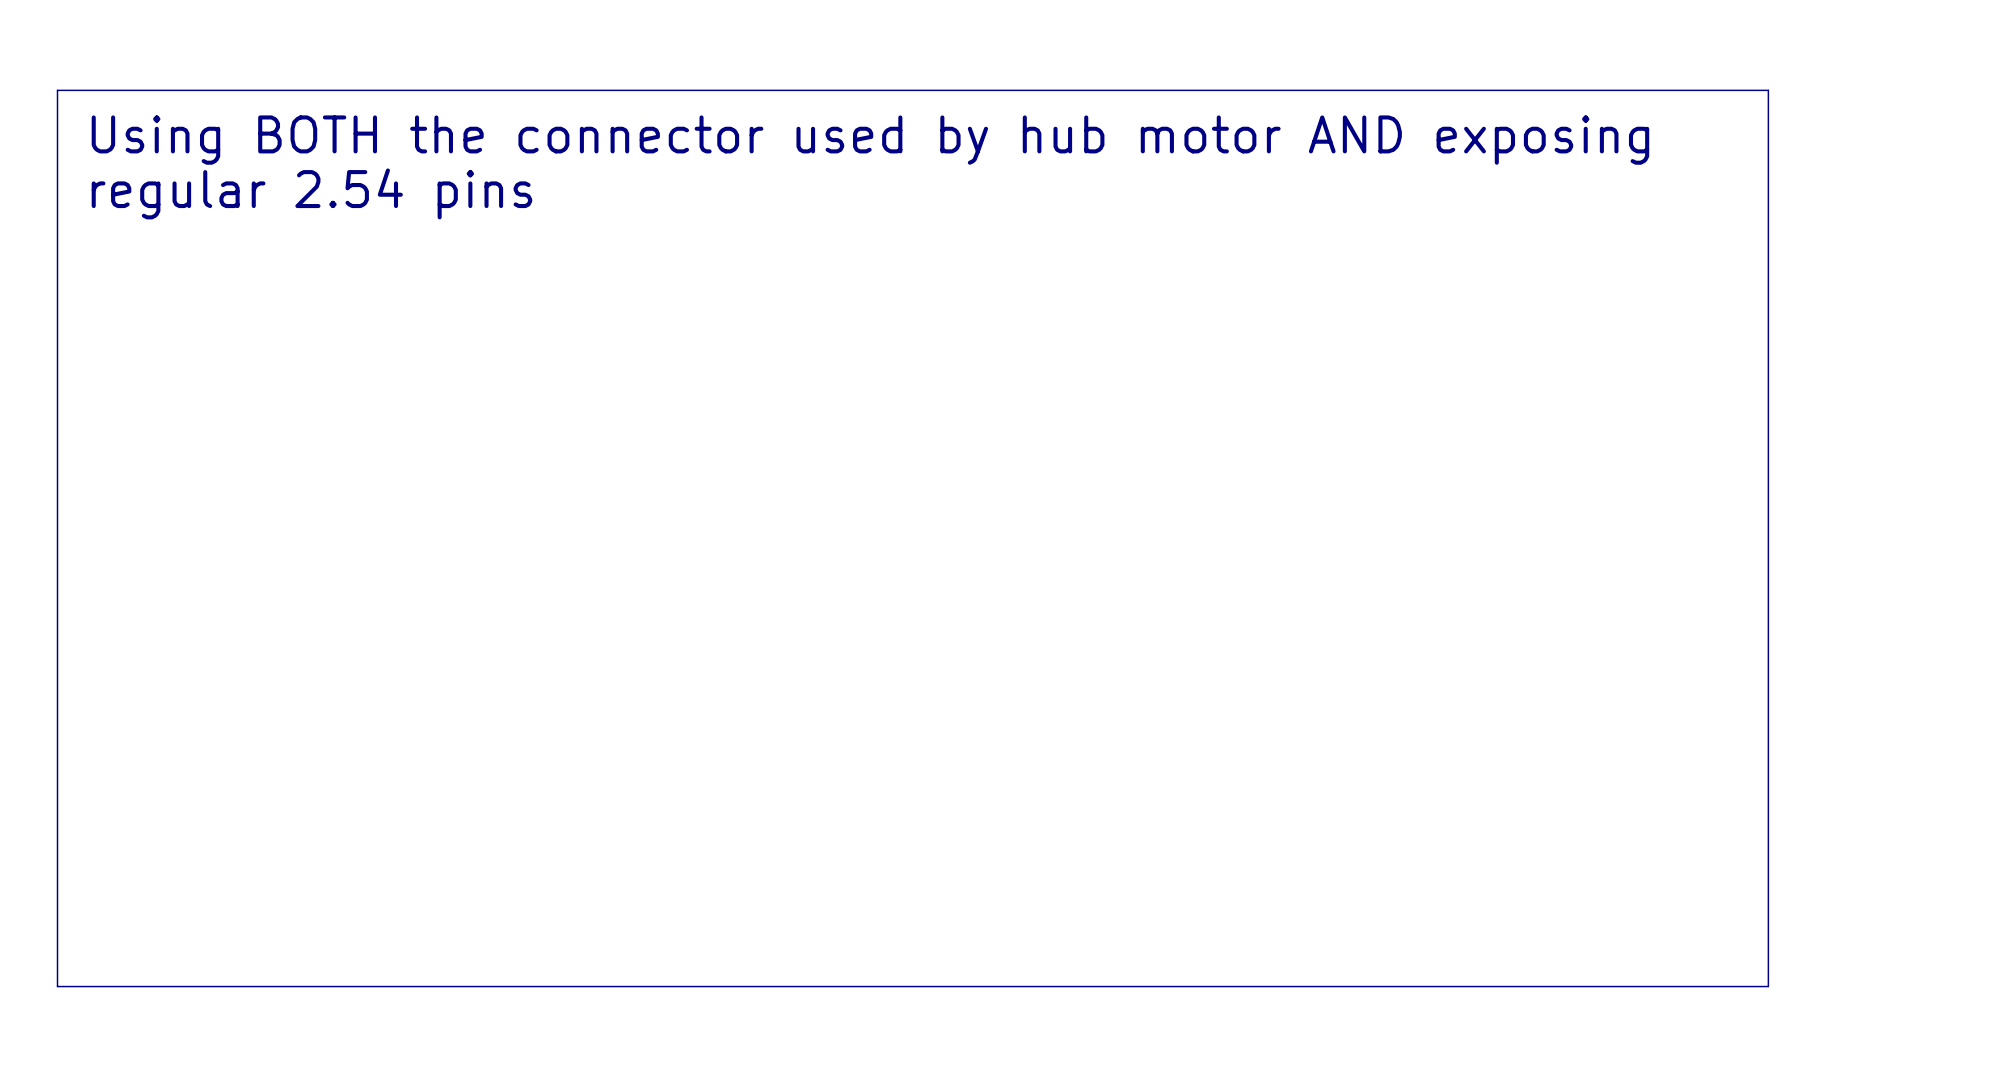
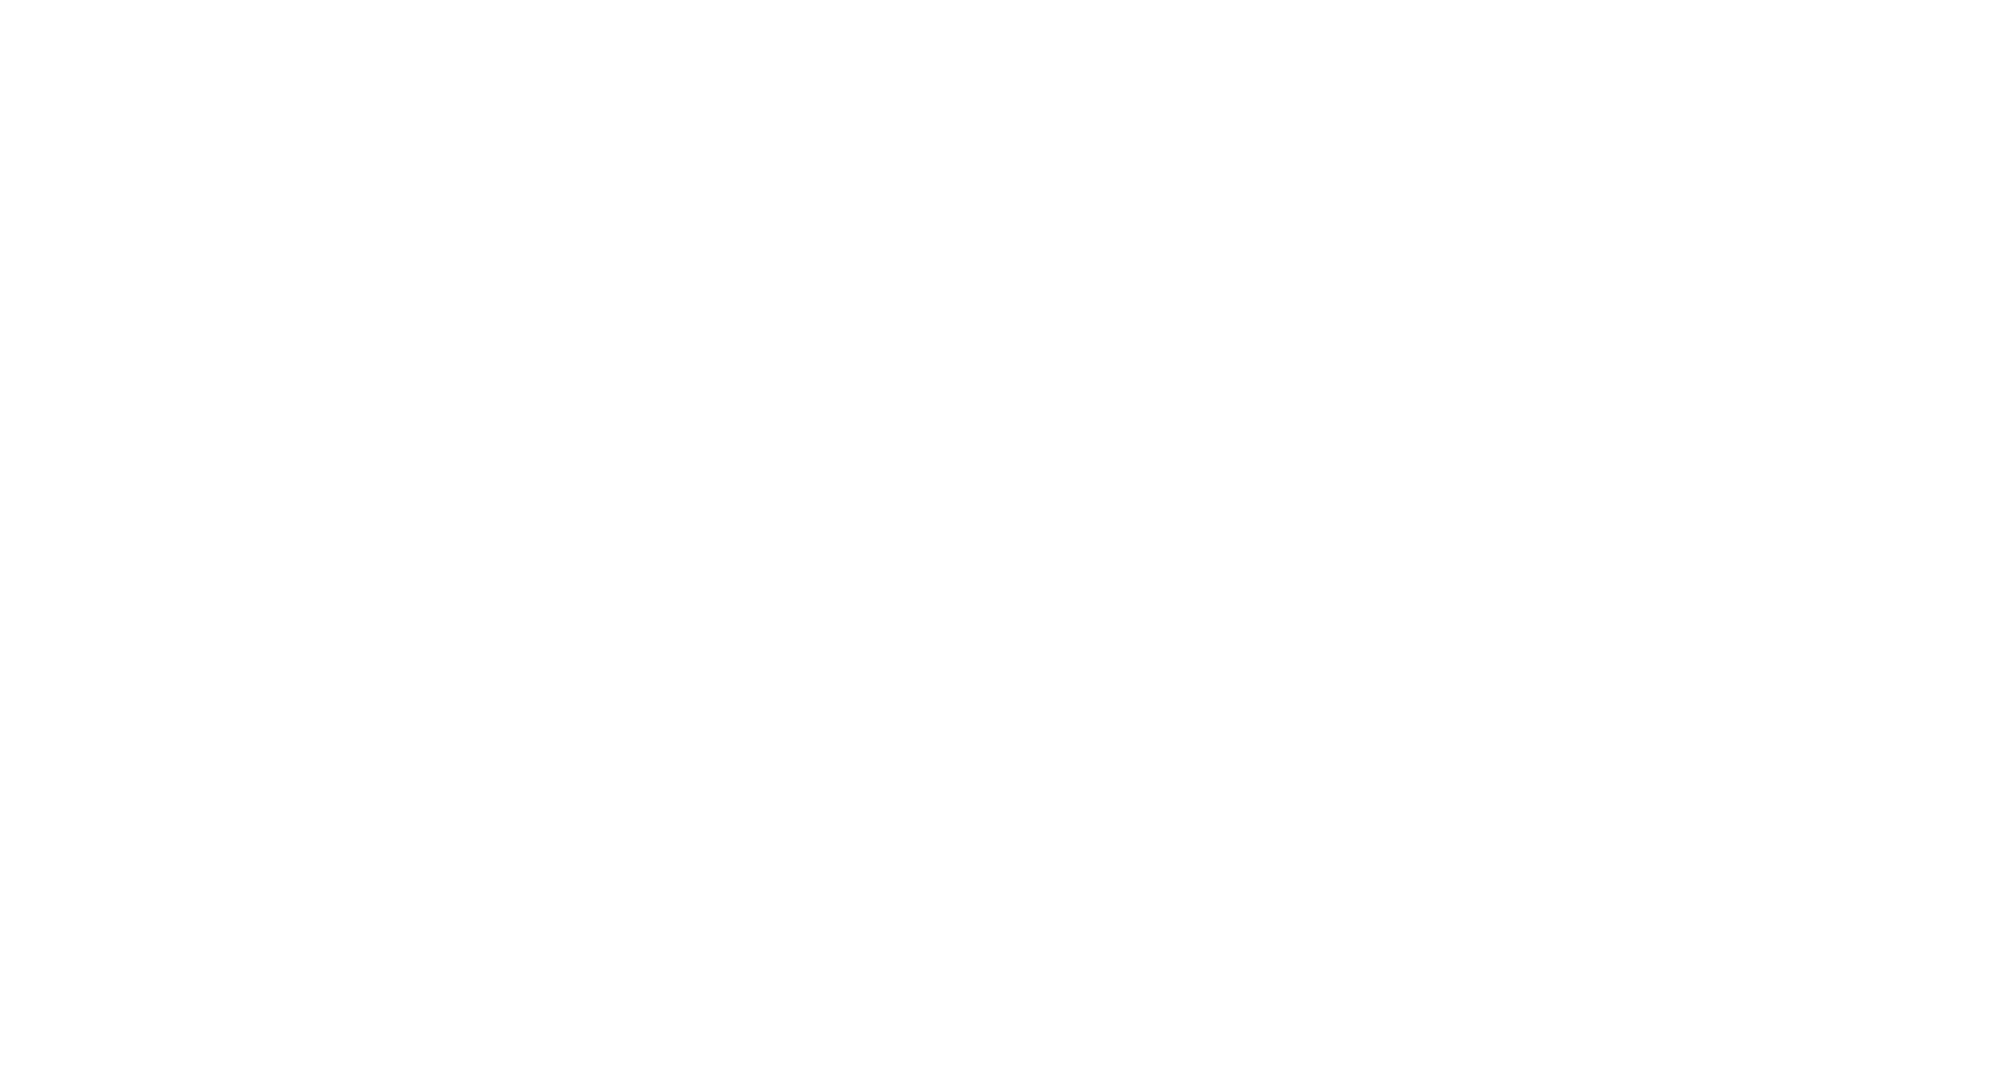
line: (57, 90) (1768, 90) (1768, 986) (57, 986) (57, 90) -> none
text: Using BOTH the connector used by hub motor AND exposing (870, 140) -> none
text: regular 2.54 pins (311, 193) -> none

